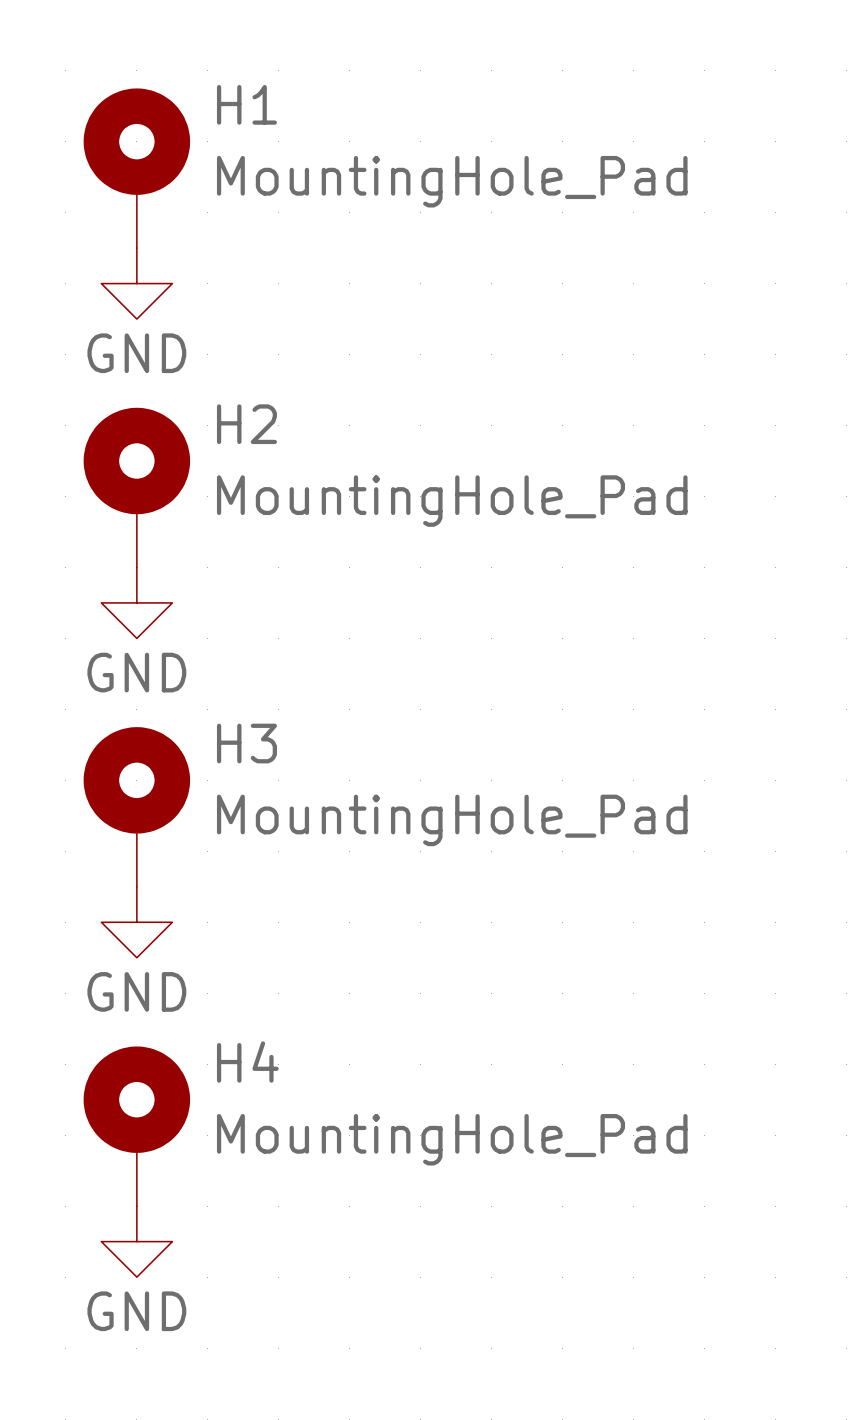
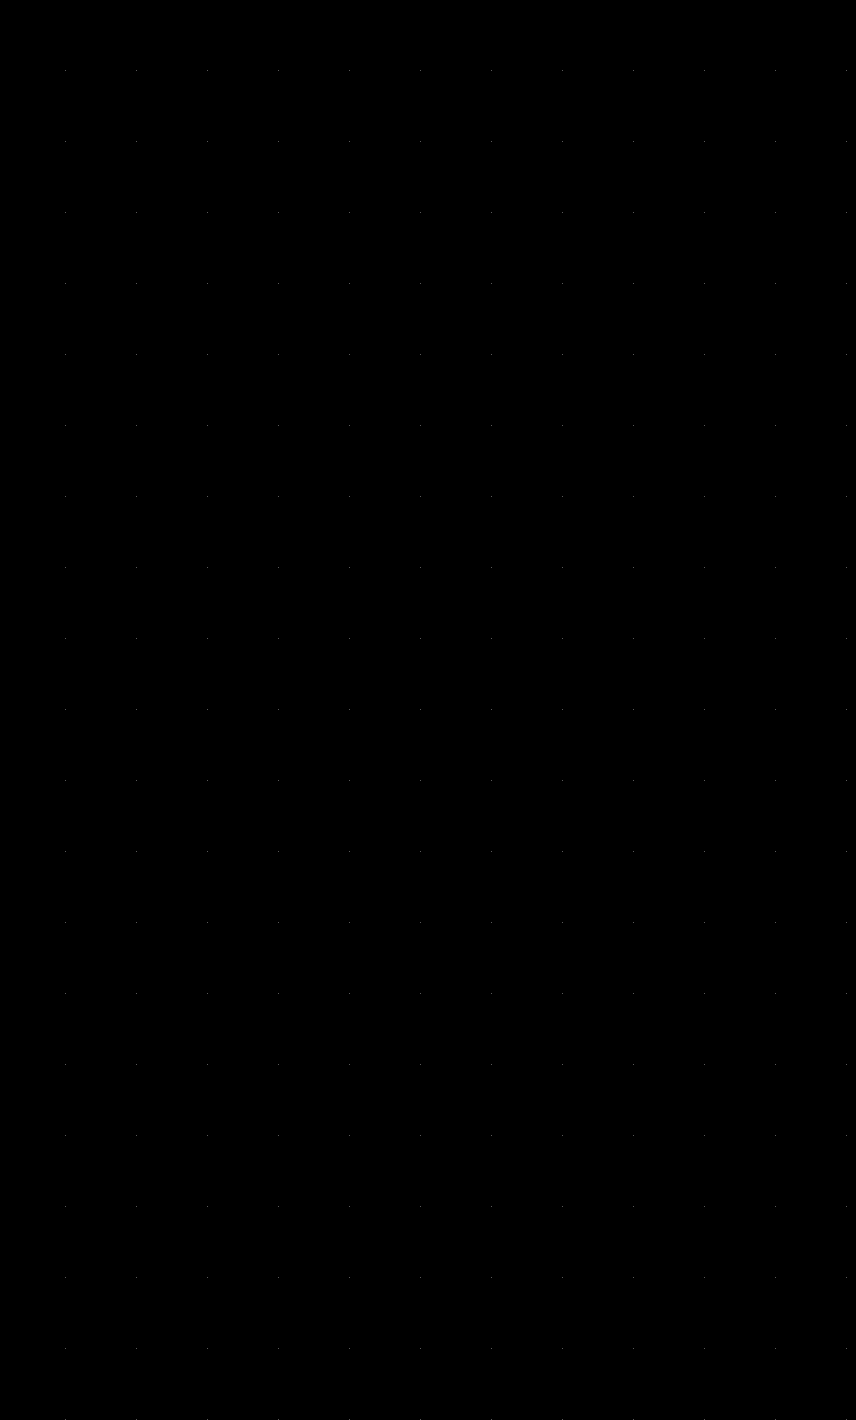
H1: MountingHole_Pad (136, 168) -> none
power symbol: GND (136, 283) -> none
H2: MountingHole_Pad (136, 487) -> none
power symbol: GND (136, 602) -> none
H3: MountingHole_Pad (136, 806) -> none
power symbol: GND (136, 922) -> none
H4: MountingHole_Pad (136, 1126) -> none
power symbol: GND (136, 1241) -> none

